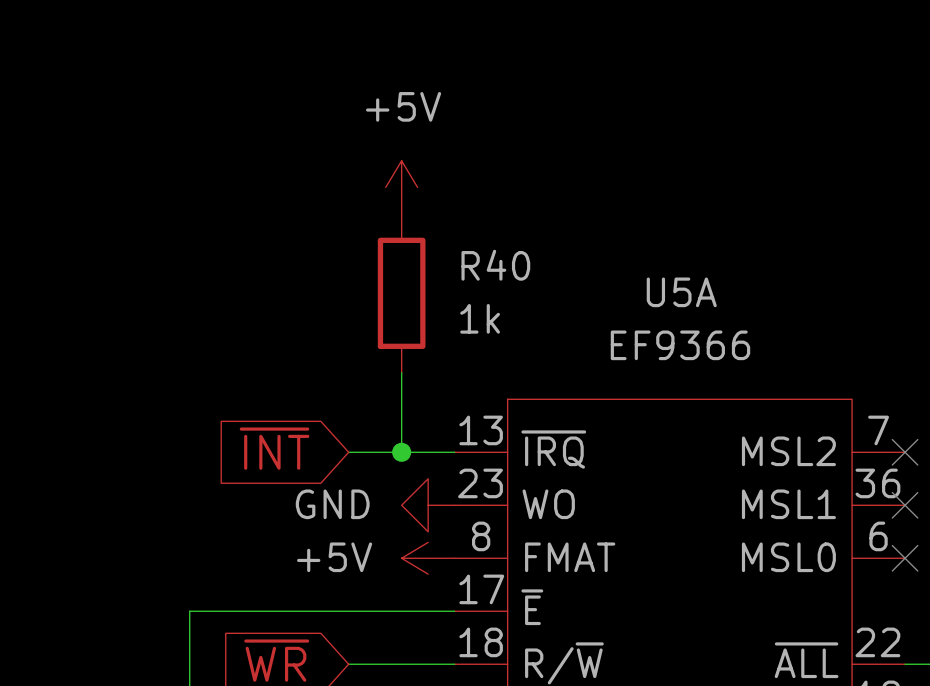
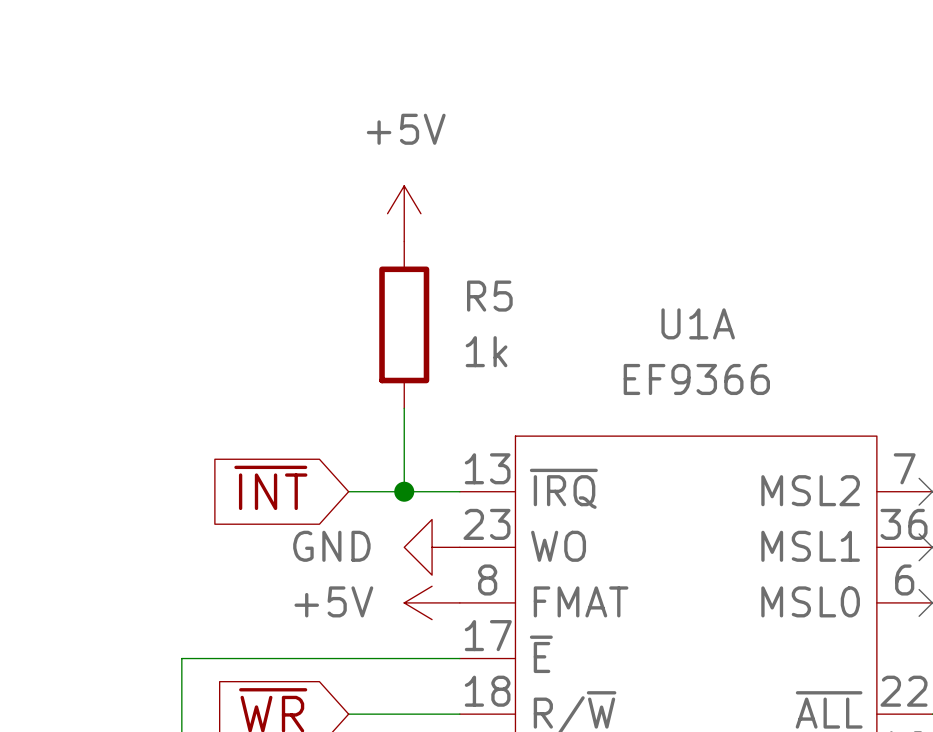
R40 name: R40 (495, 265) -> R5 (489, 296)
U5A name: U5A (681, 292) -> U1A (698, 323)

